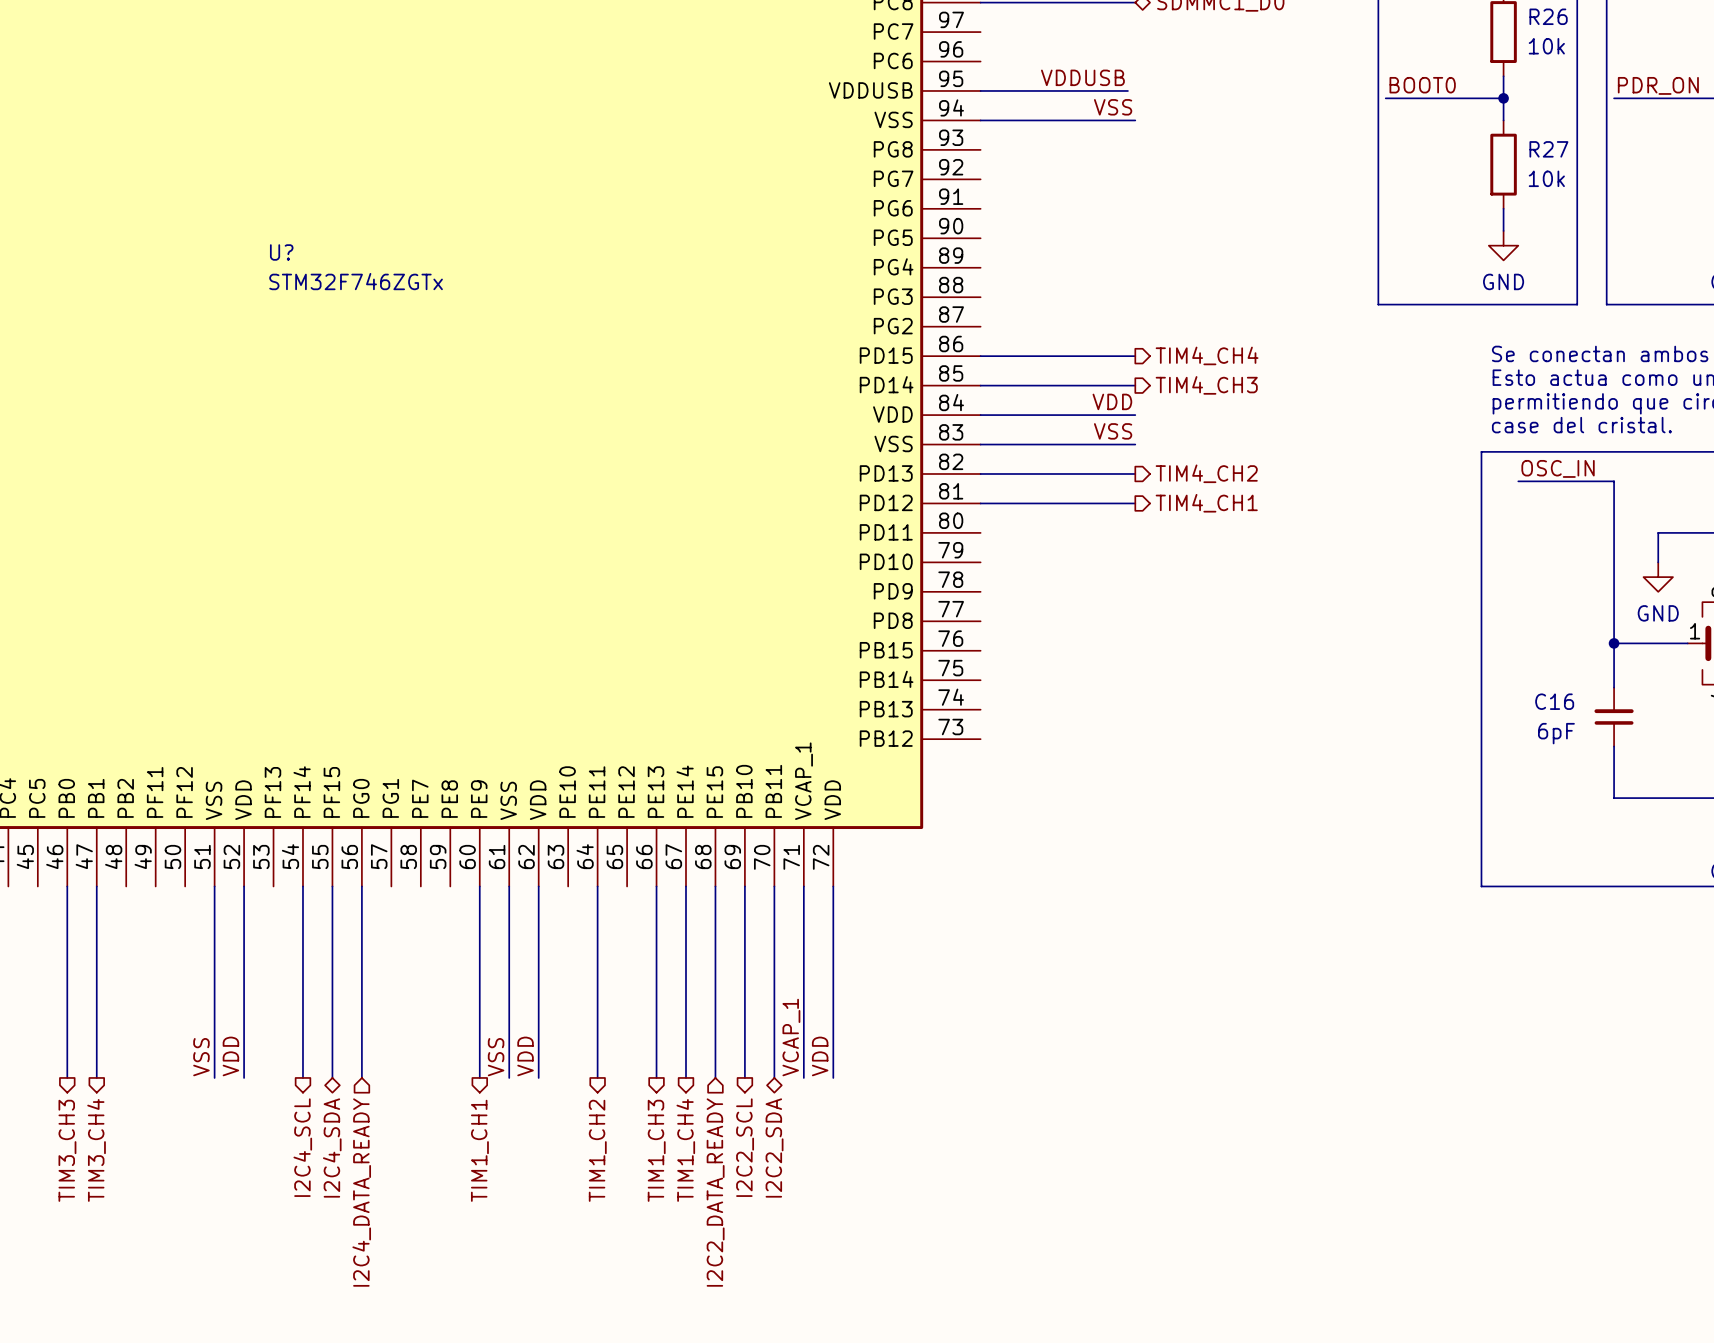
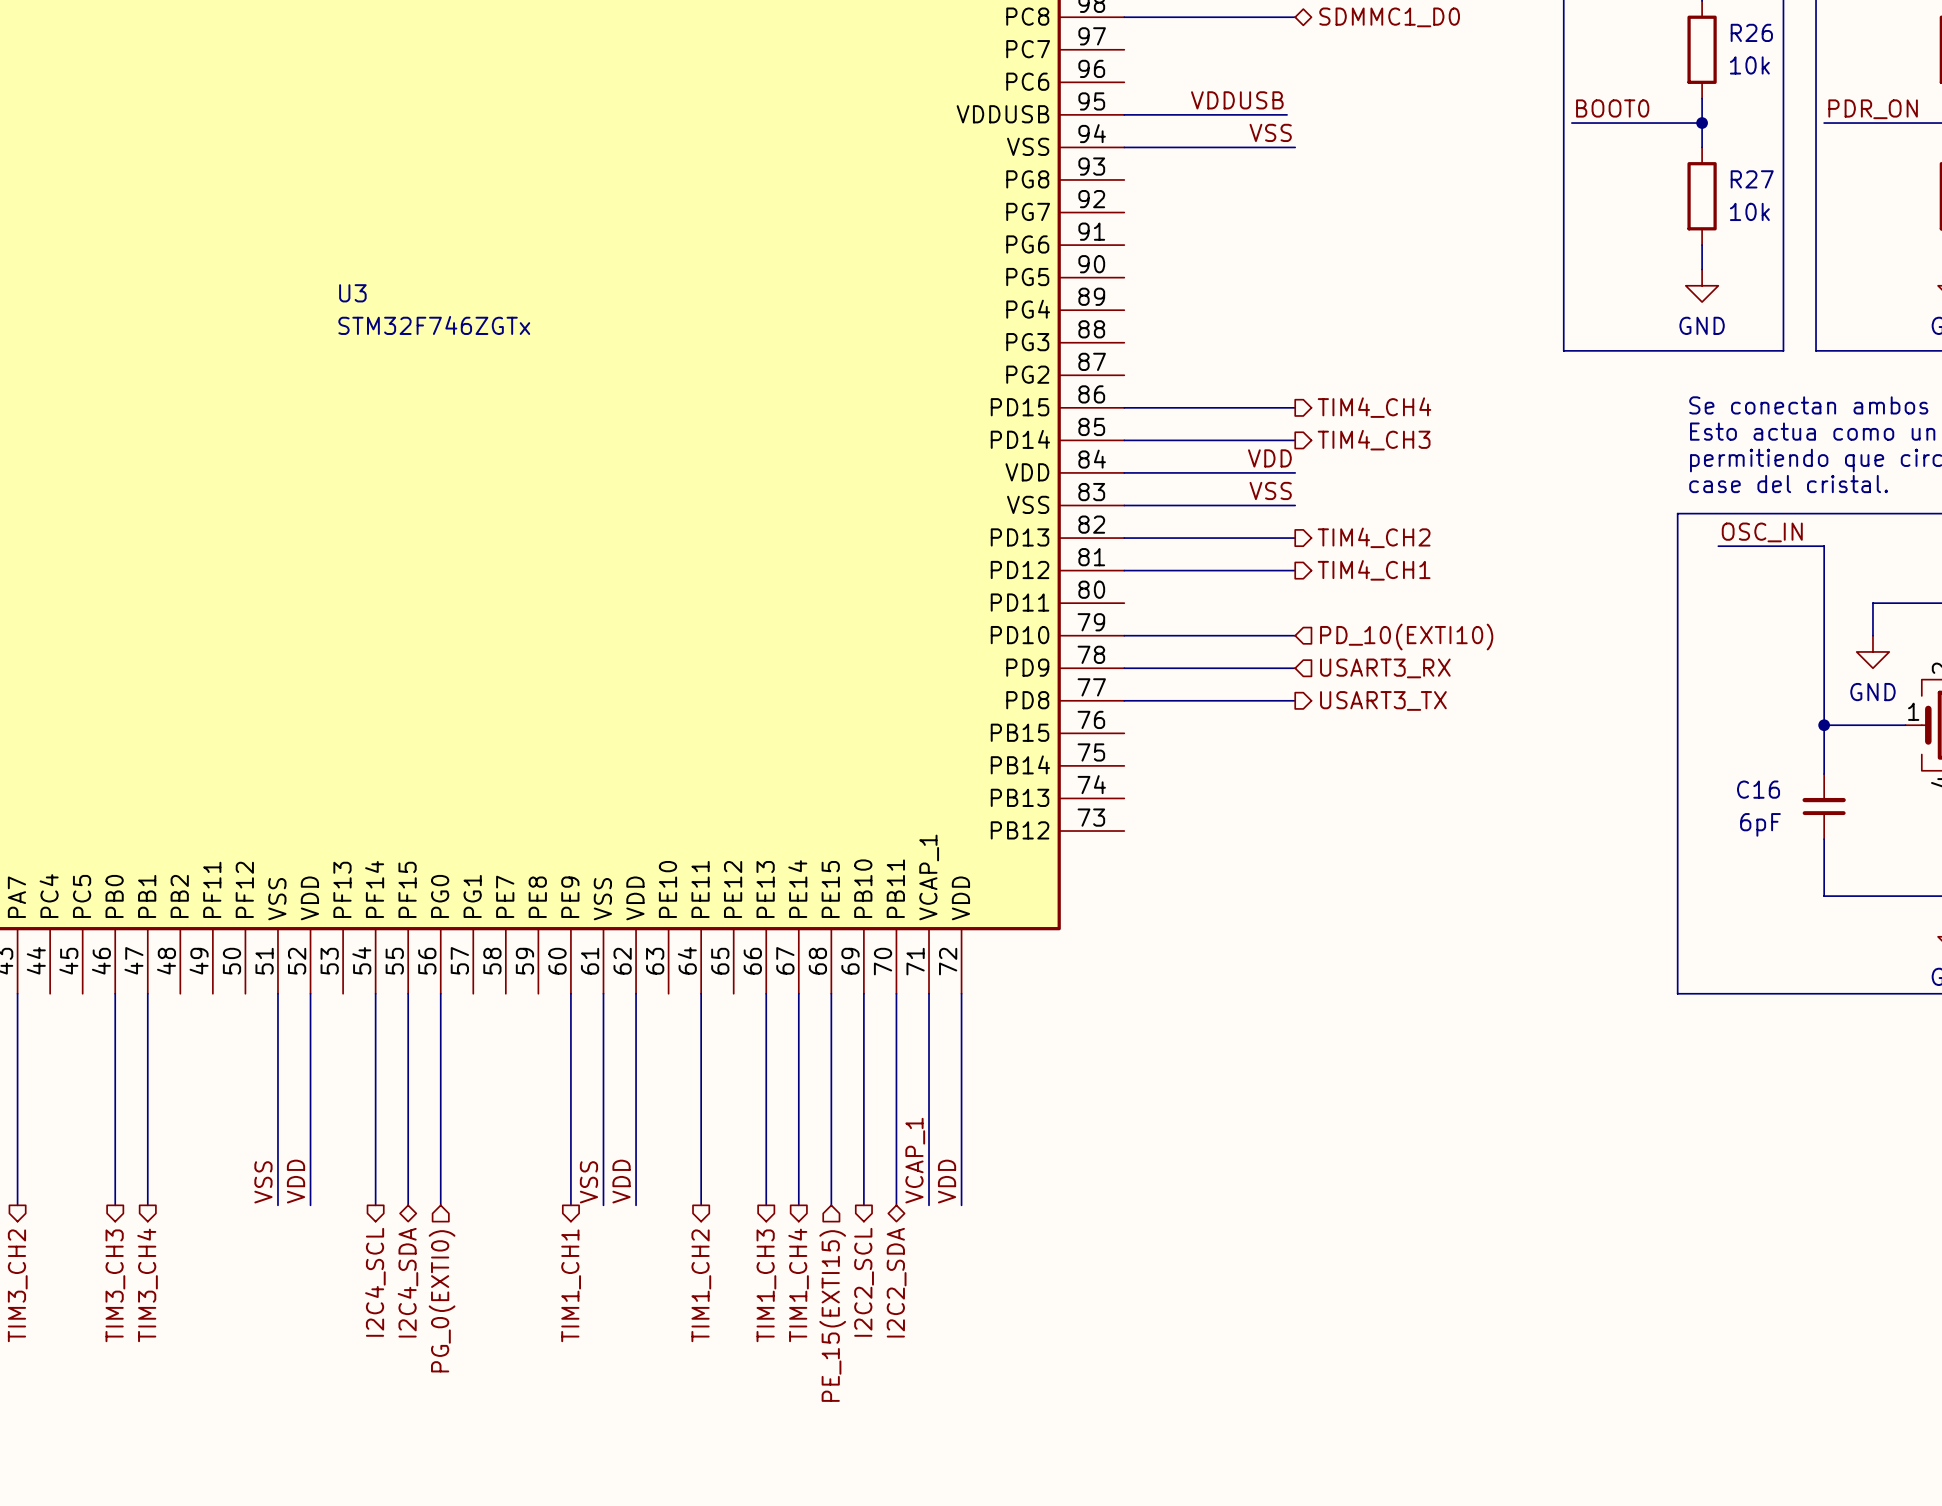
U? name: U? (281, 252) -> U3 (352, 293)
wire: none -> (1124, 635) (1295, 635)
hierarchical label: none -> PD_10(EXTI10) (1406, 637)
wire: none -> (1124, 668) (1295, 668)
hierarchical label: none -> USART3_RX (1385, 668)
wire: none -> (1124, 700) (1295, 700)
hierarchical label: none -> USART3_TX (1383, 700)
hierarchical label: I2C4_DATA_READY (361, 1192) -> PG_0(EXTI0) (442, 1301)
hierarchical label: I2C2_DATA_READY (715, 1192) -> PE_15(EXTI15) (832, 1316)

